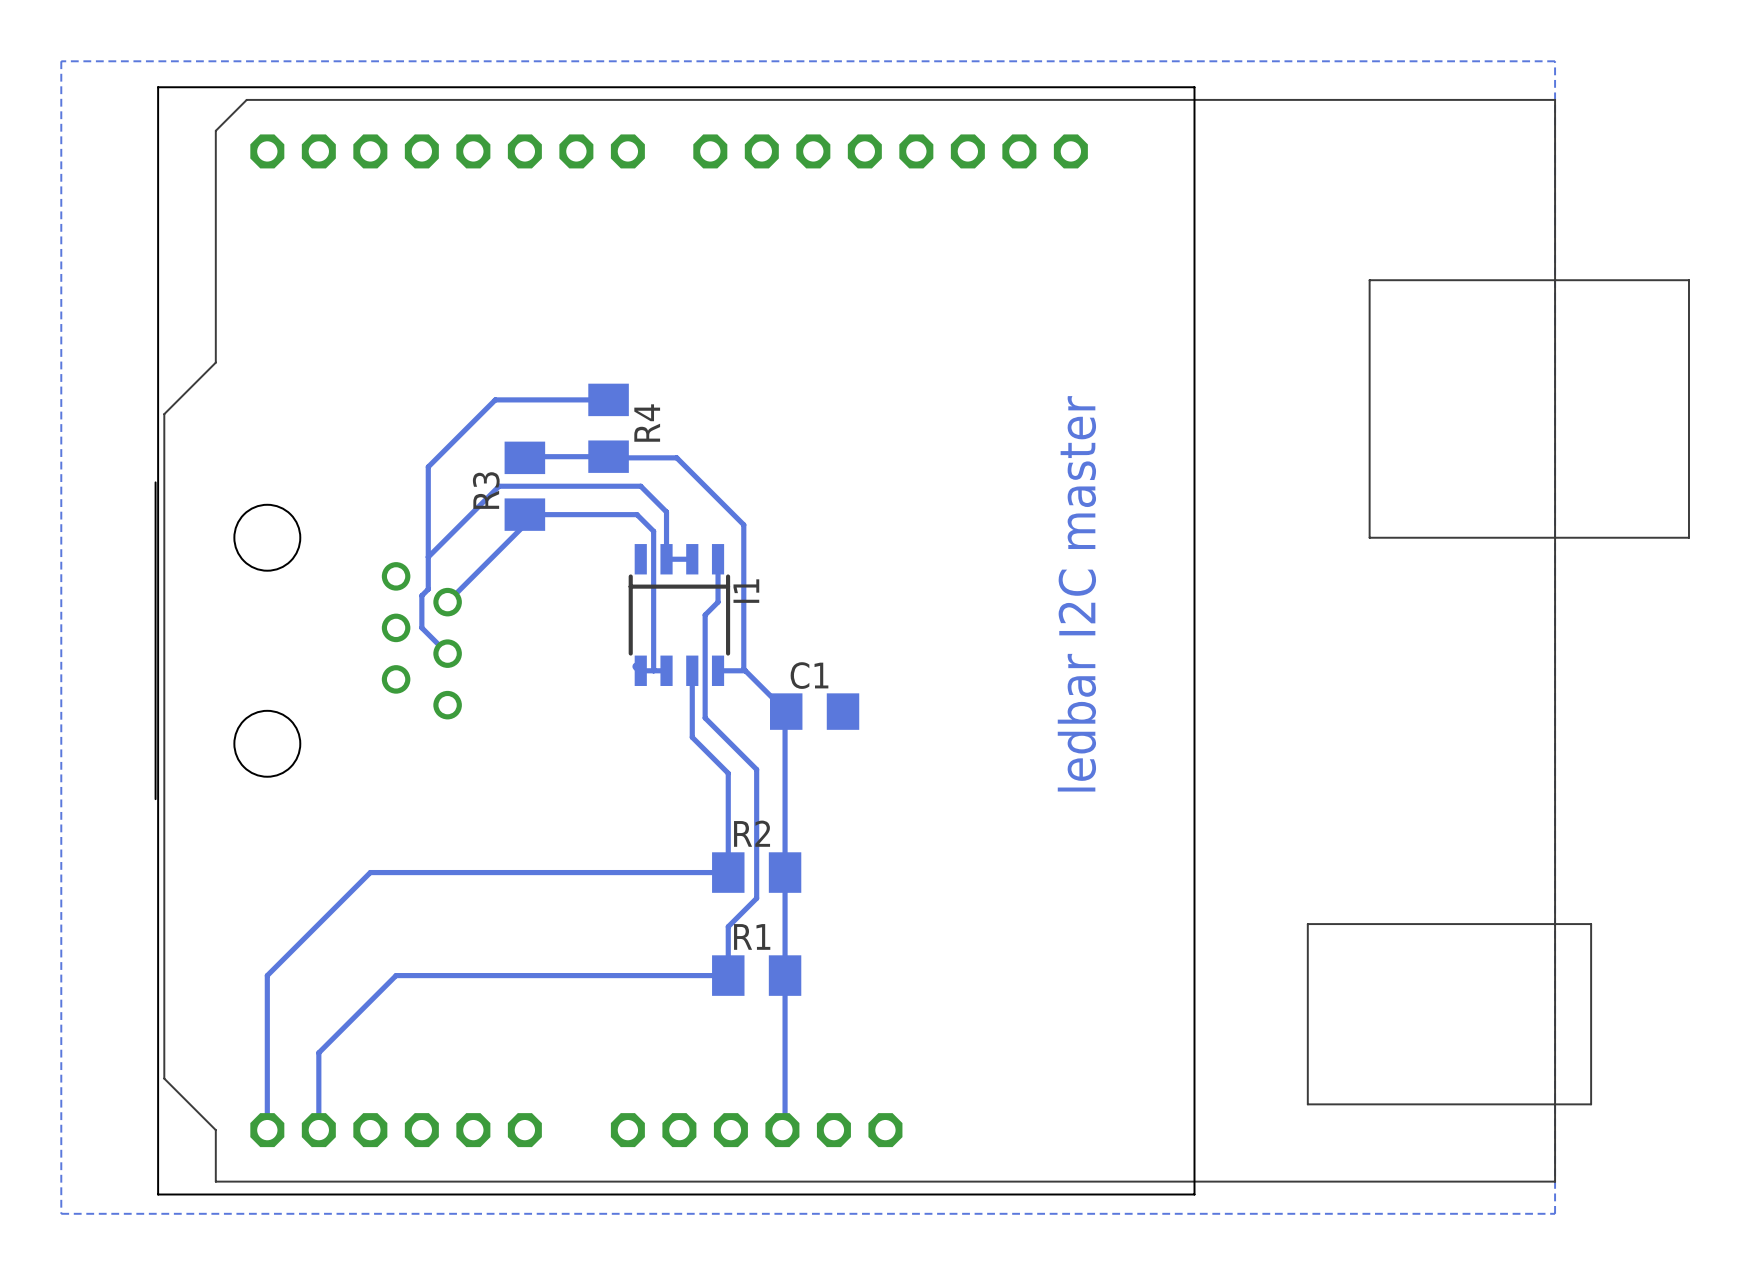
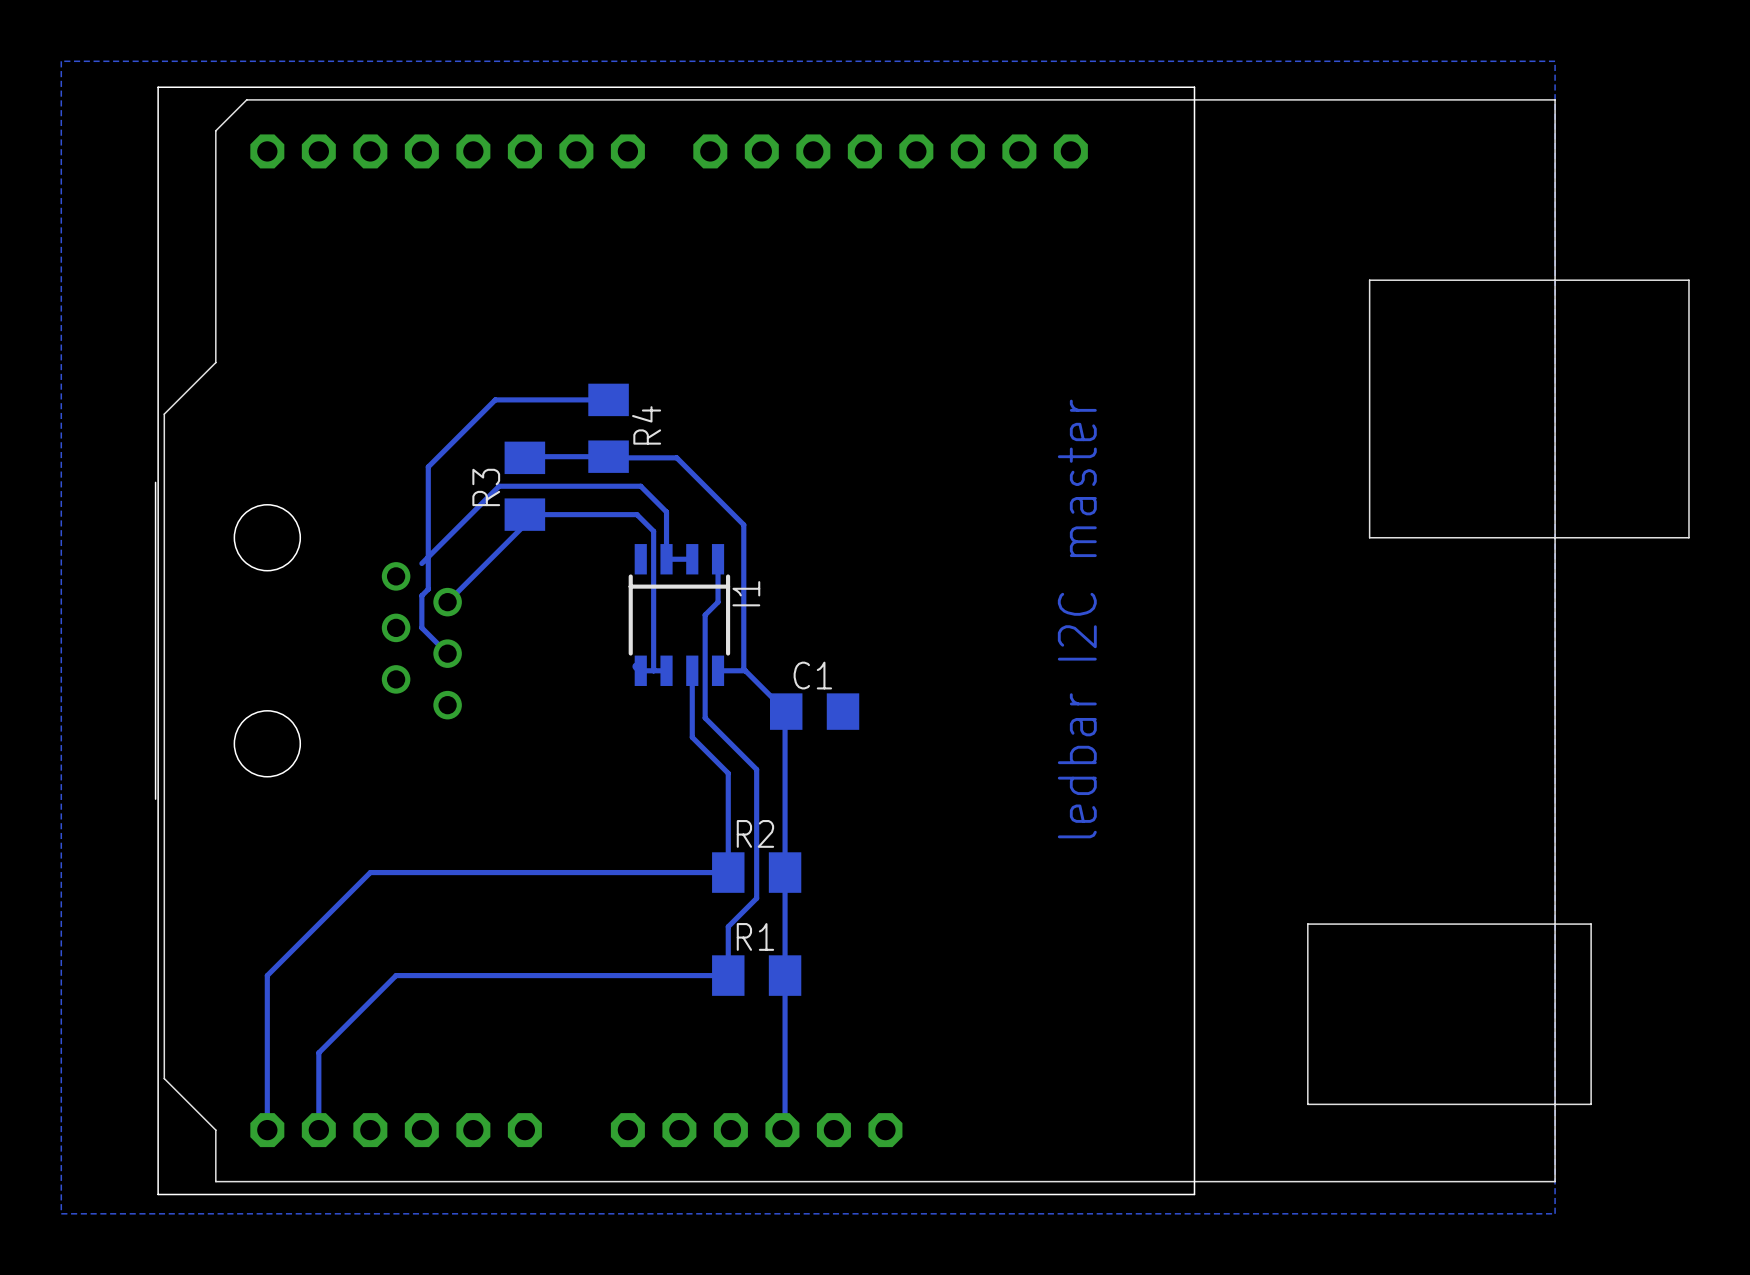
track: none -> (428, 557) (421, 563)

